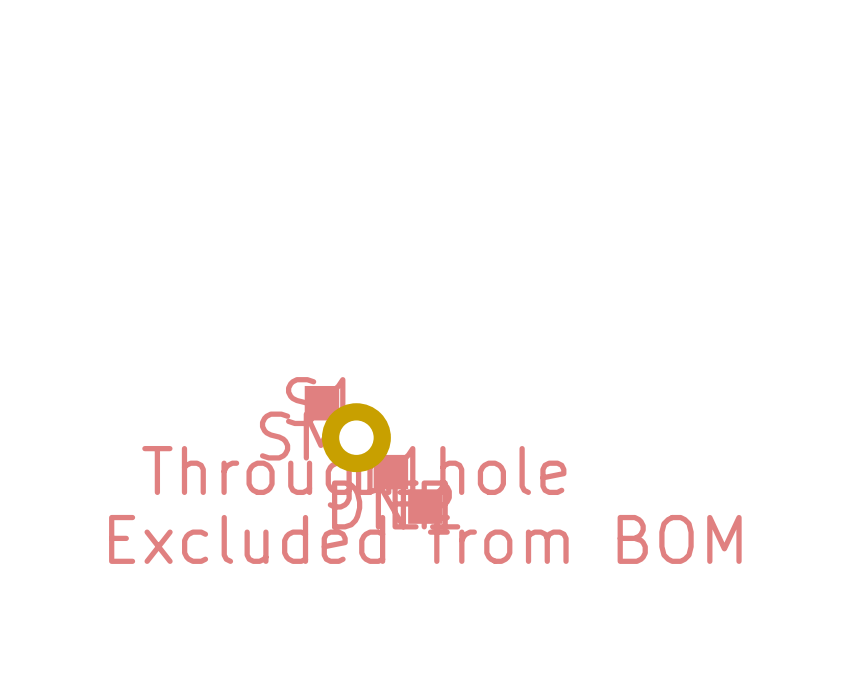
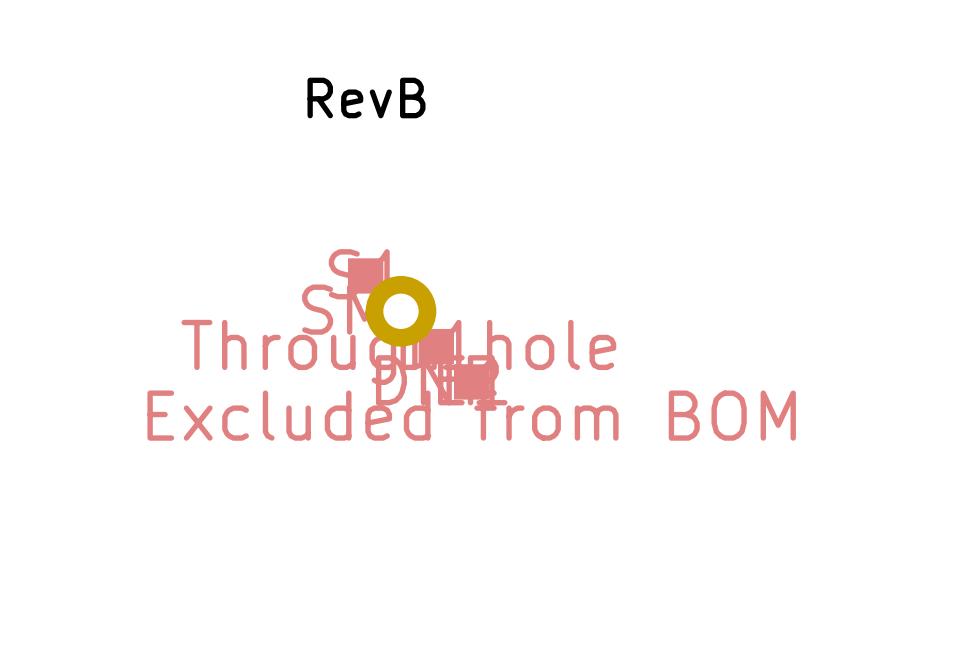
text: none -> RevB (366, 98)

